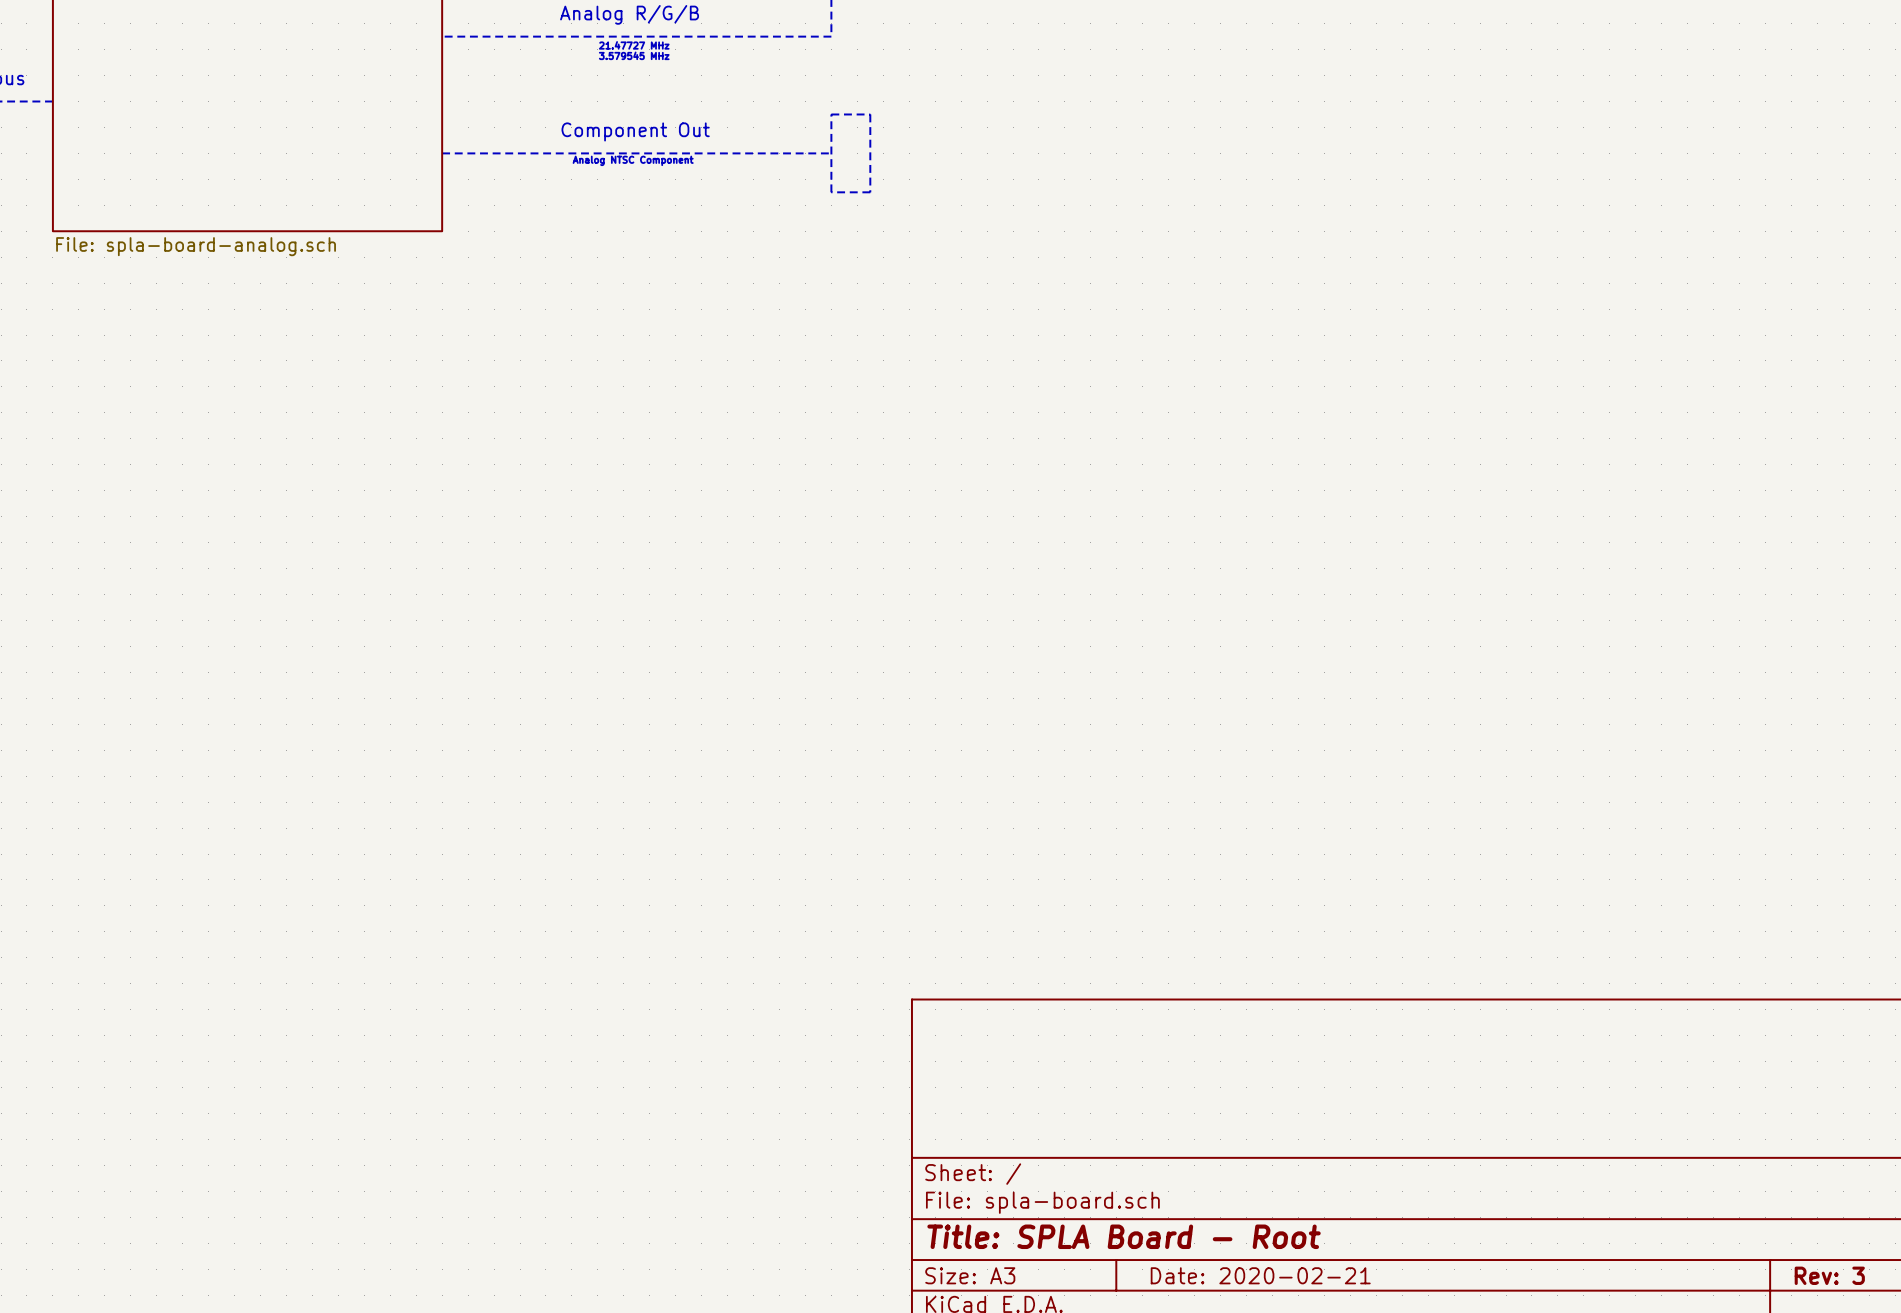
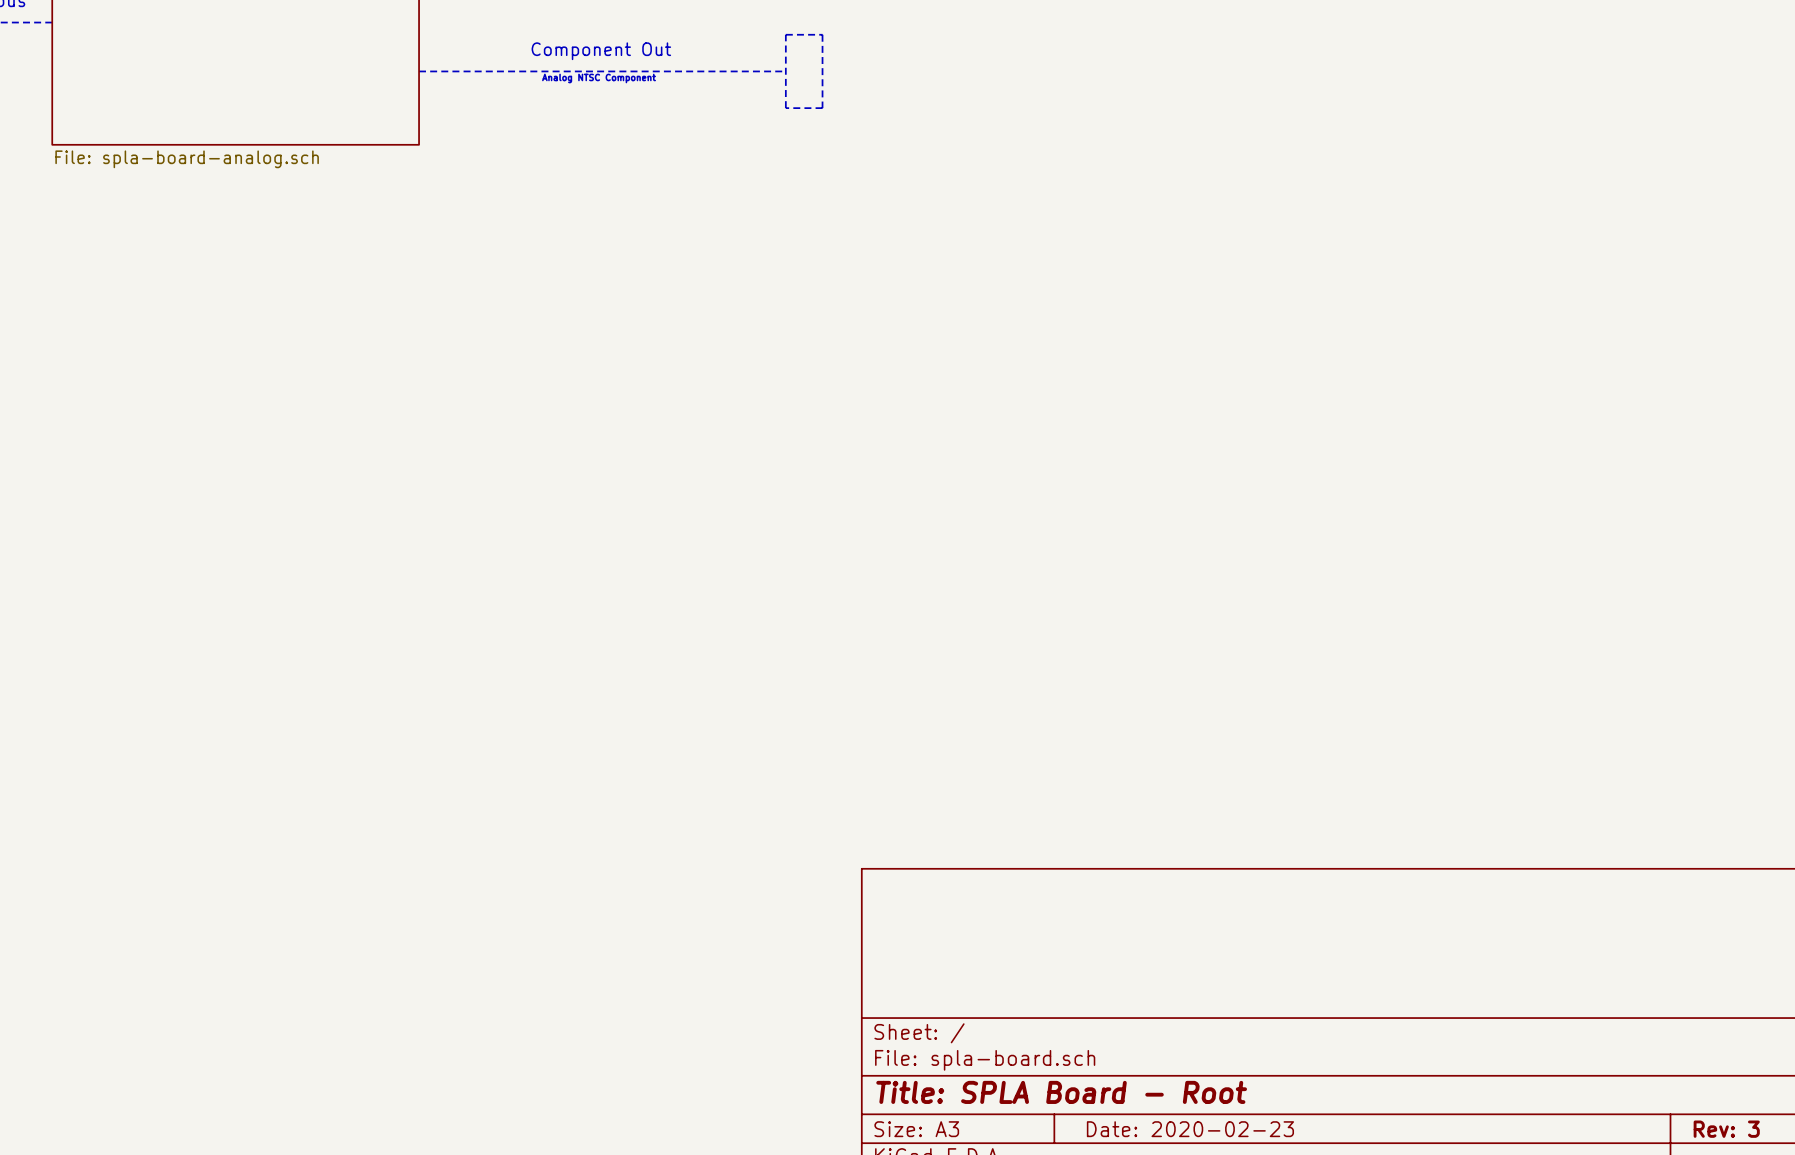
title block: Date: 2020-02-21 (1260, 1275) -> Date: 2020-02-23 (1190, 1129)

